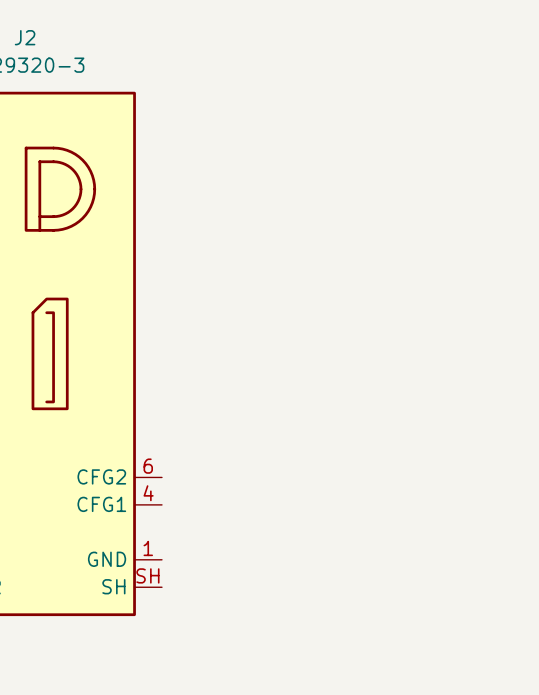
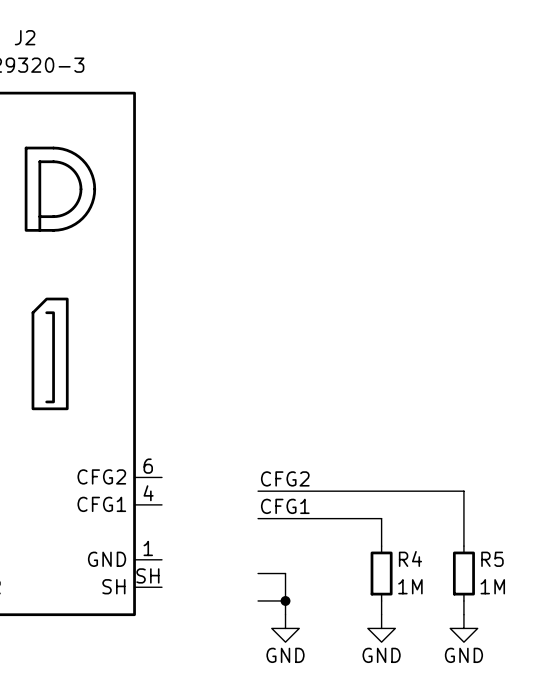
label: none -> CFG2 (285, 478)
wire: none -> (258, 491) (463, 491) (463, 546)
label: none -> CFG1 (285, 506)
wire: none -> (258, 518) (381, 518) (381, 546)
wire: none -> (258, 573) (285, 573) (285, 614)
R4: none -> (381, 573)
R5: none -> (463, 573)
wire: none -> (258, 600) (285, 600)
junction: none -> (285, 600)
wire: none -> (381, 600) (381, 614)
wire: none -> (463, 600) (463, 614)
power symbol: none -> GND (285, 628)
power symbol: none -> GND (381, 628)
power symbol: none -> GND (463, 628)

